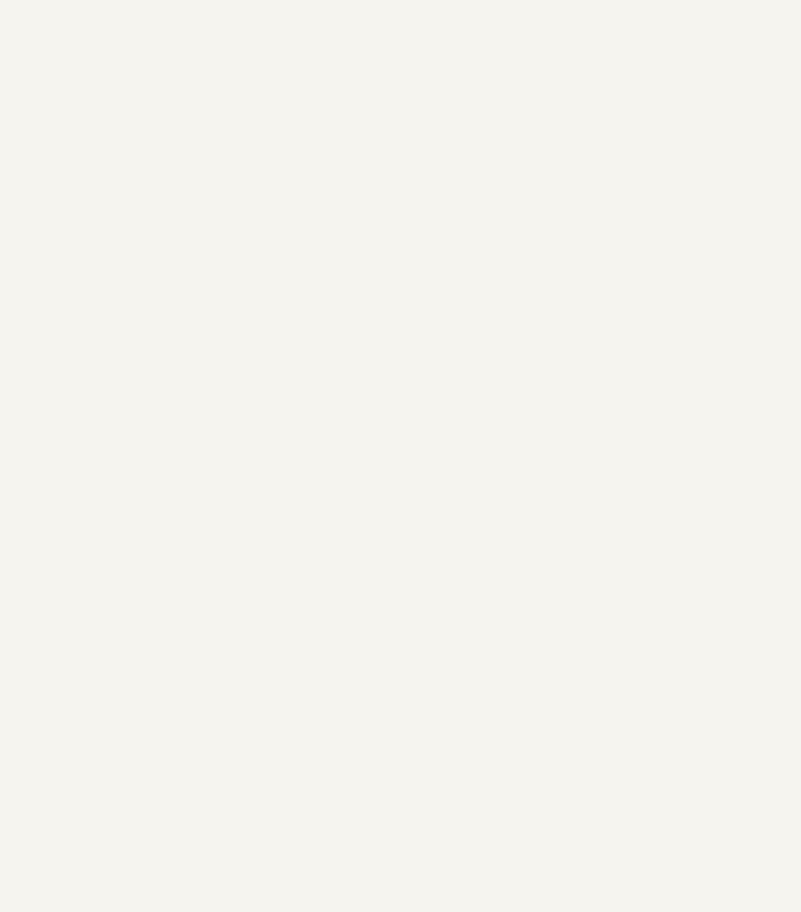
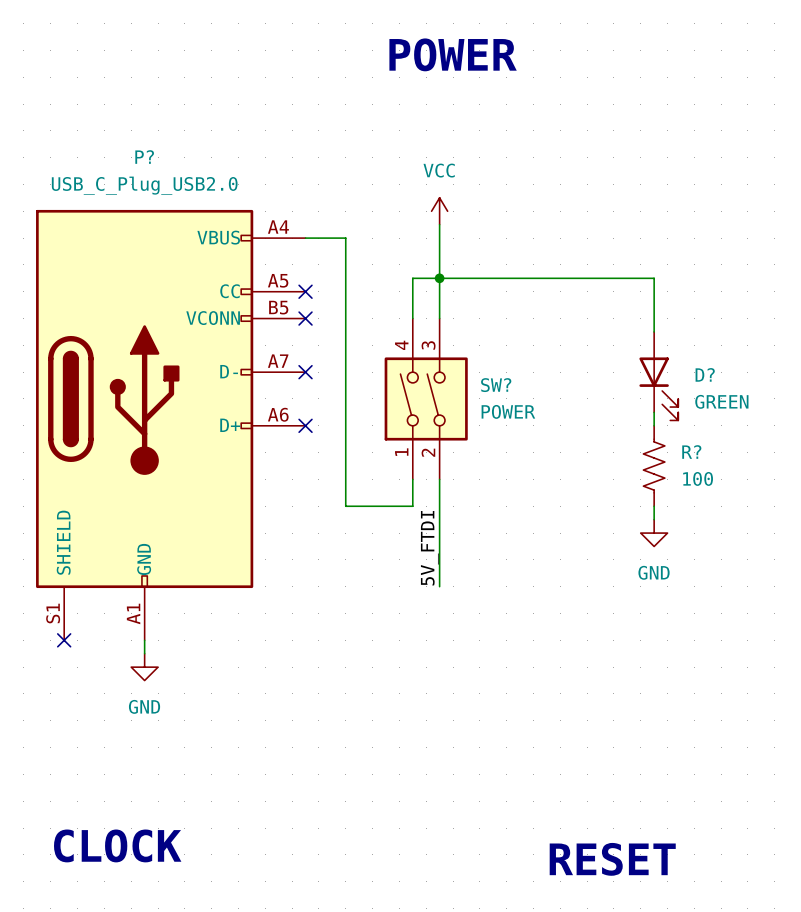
text: none -> POWER (453, 54)
power symbol: none -> VCC (439, 211)
wire: none -> (439, 224) (439, 318)
wire: none -> (305, 238) (345, 238) (345, 506) (412, 506) (412, 479)
junction: none -> (439, 278)
no-connect mark: none -> (305, 291)
no-connect mark: none -> (305, 318)
wire: none -> (412, 318) (412, 278) (654, 278) (654, 331)
no-connect mark: none -> (305, 372)
D?: none -> GREEN (658, 376)
SW?: none -> POWER (426, 398)
wire: none -> (654, 412) (654, 425)
P?: none -> USB_C_Plug_USB2.0 (170, 425)
no-connect mark: none -> (305, 425)
R?: none -> 100 (654, 466)
wire: none -> (439, 479) (439, 586)
wire: none -> (654, 506) (654, 519)
power symbol: none -> GND (654, 533)
label: none -> 5V_FTDI (429, 548)
no-connect mark: none -> (64, 640)
wire: none -> (144, 640) (144, 653)
power symbol: none -> GND (144, 667)
text: none -> CLOCK (117, 845)
text: none -> RESET (612, 859)

